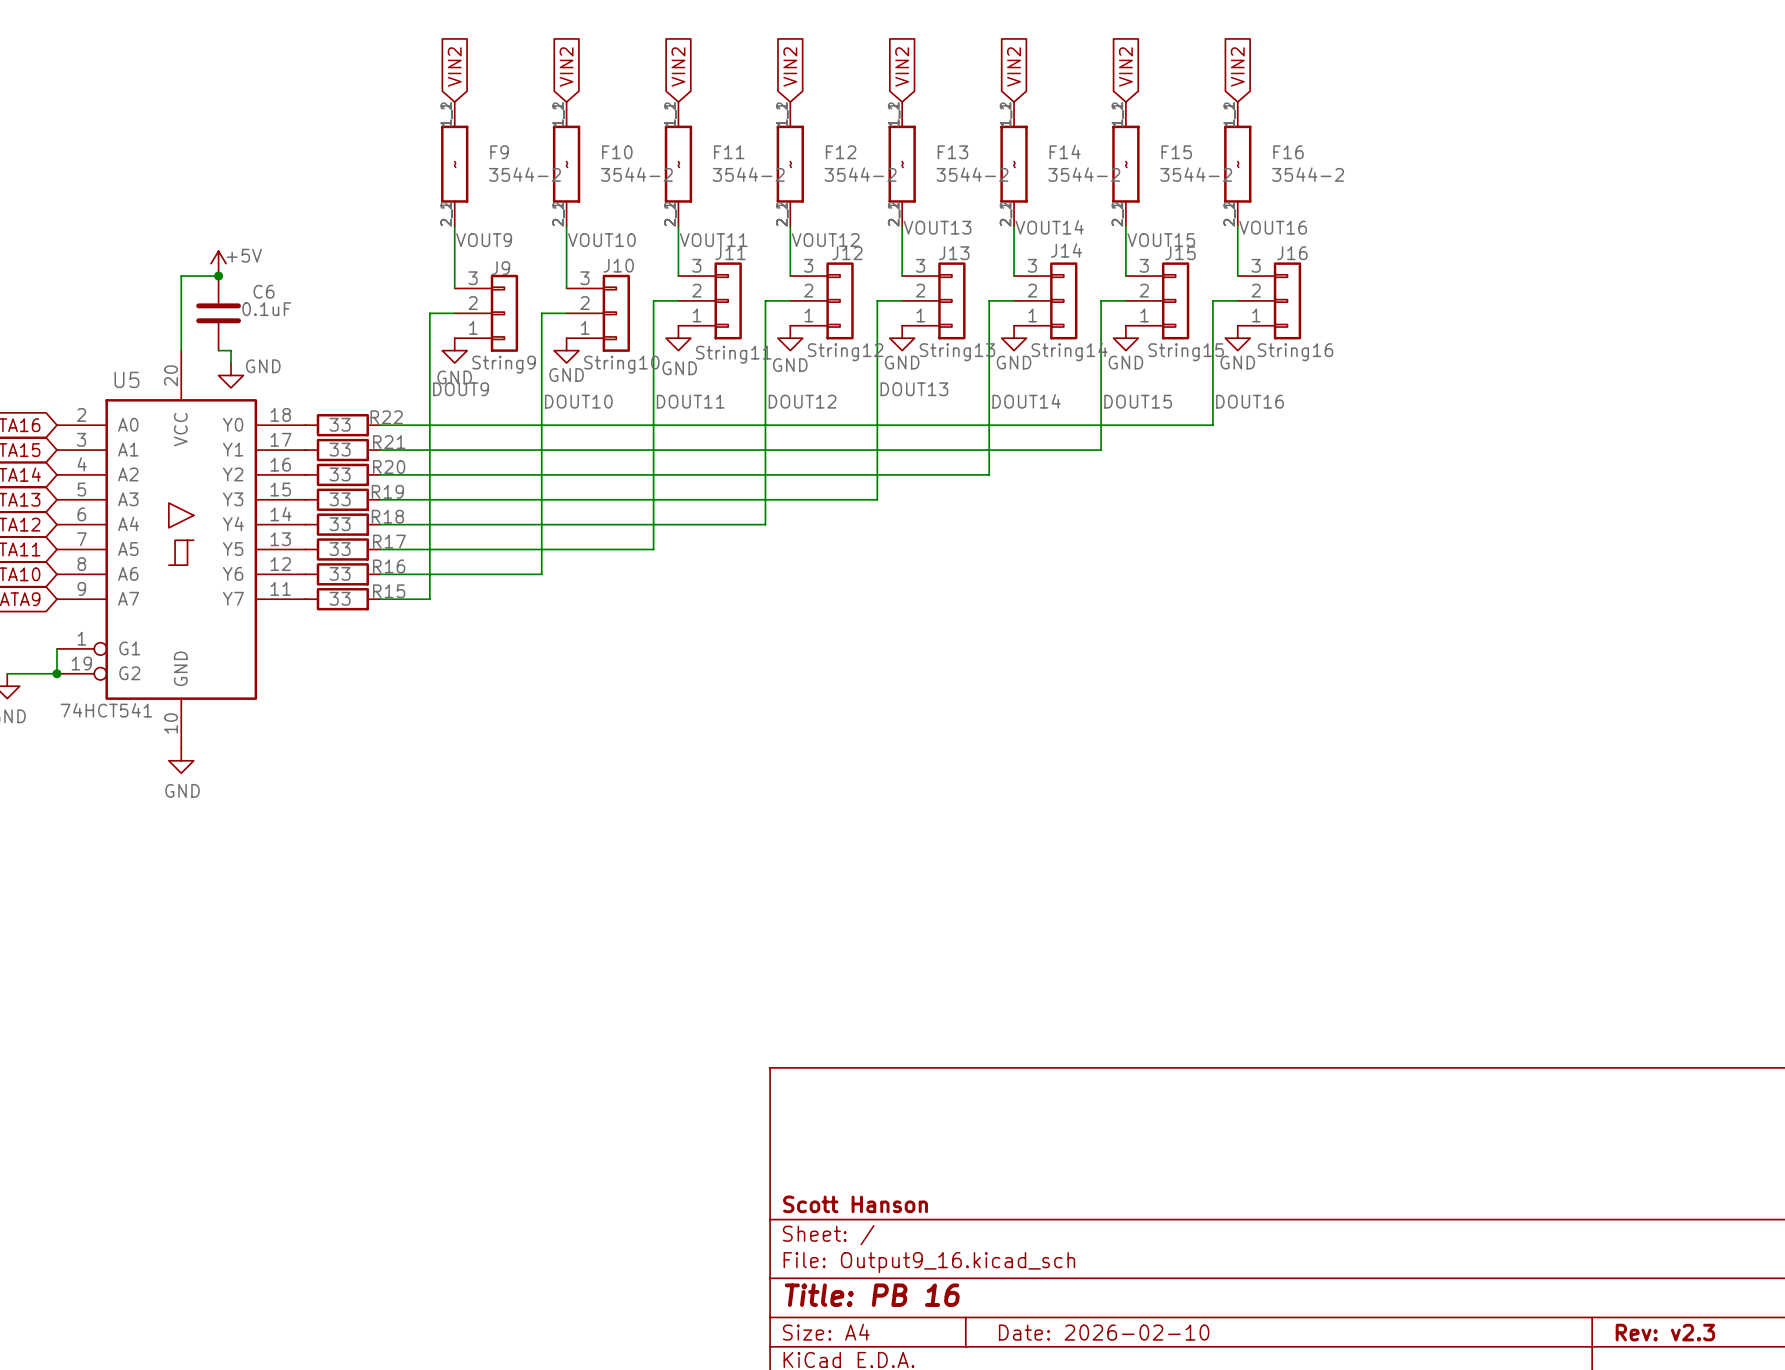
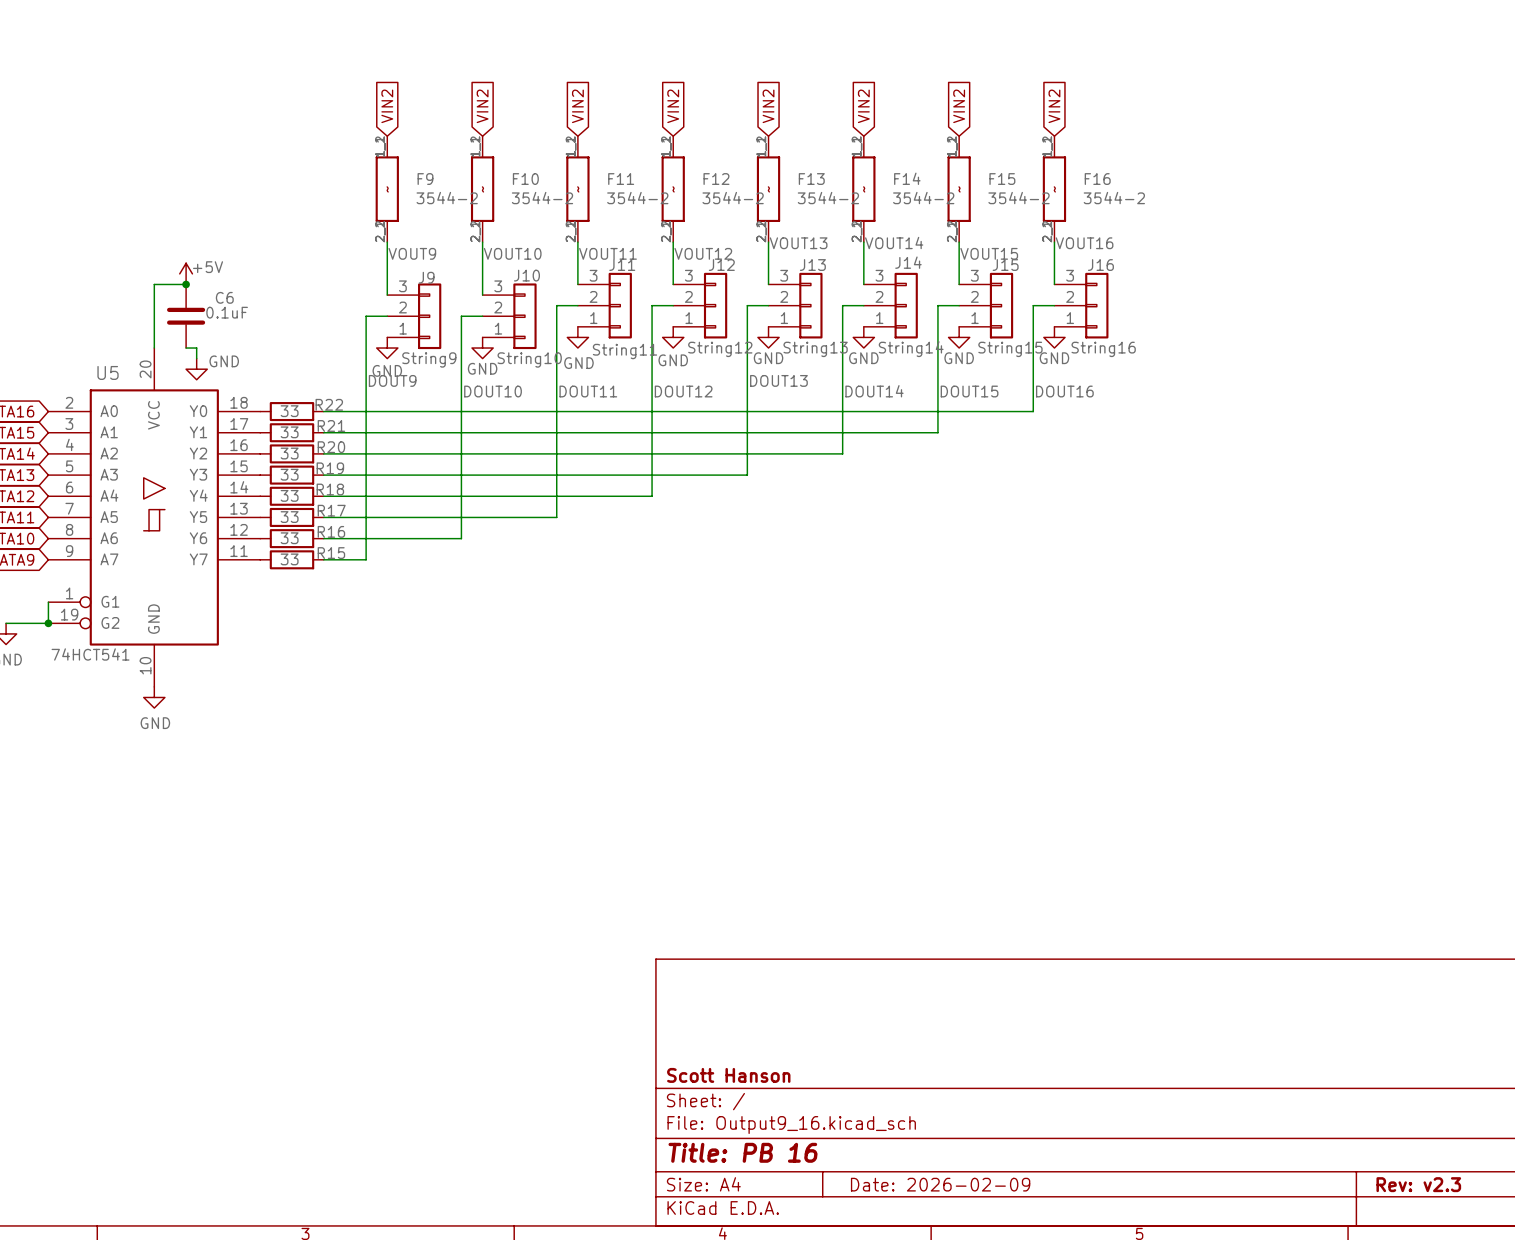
title block: Date: 2026-02-10 (1104, 1332) -> Date: 2026-02-09 (940, 1184)

